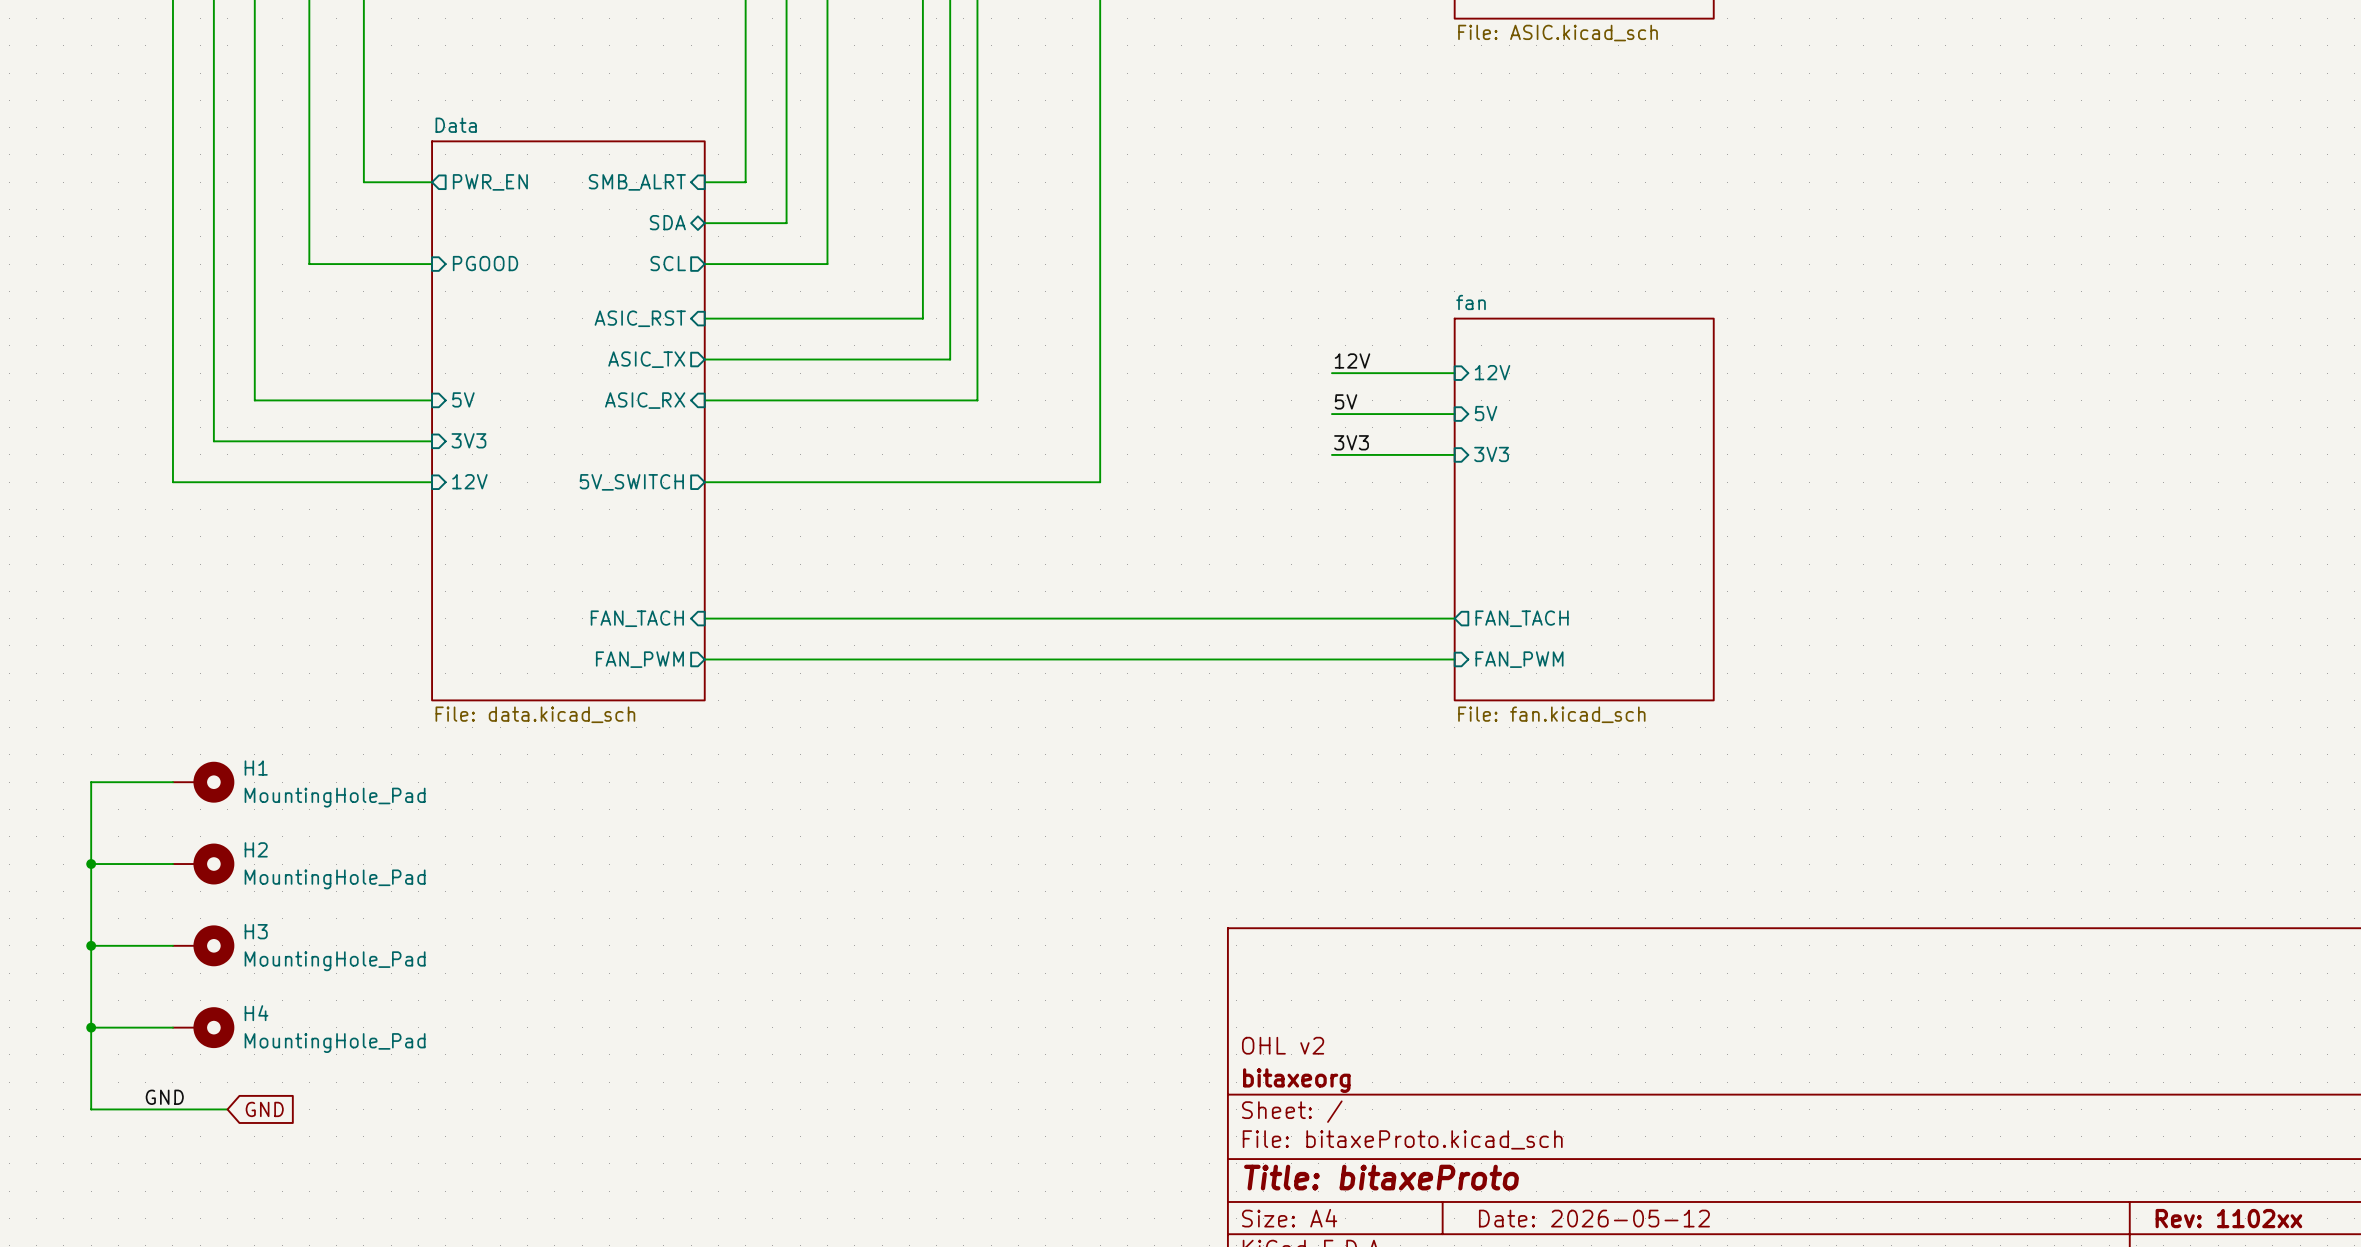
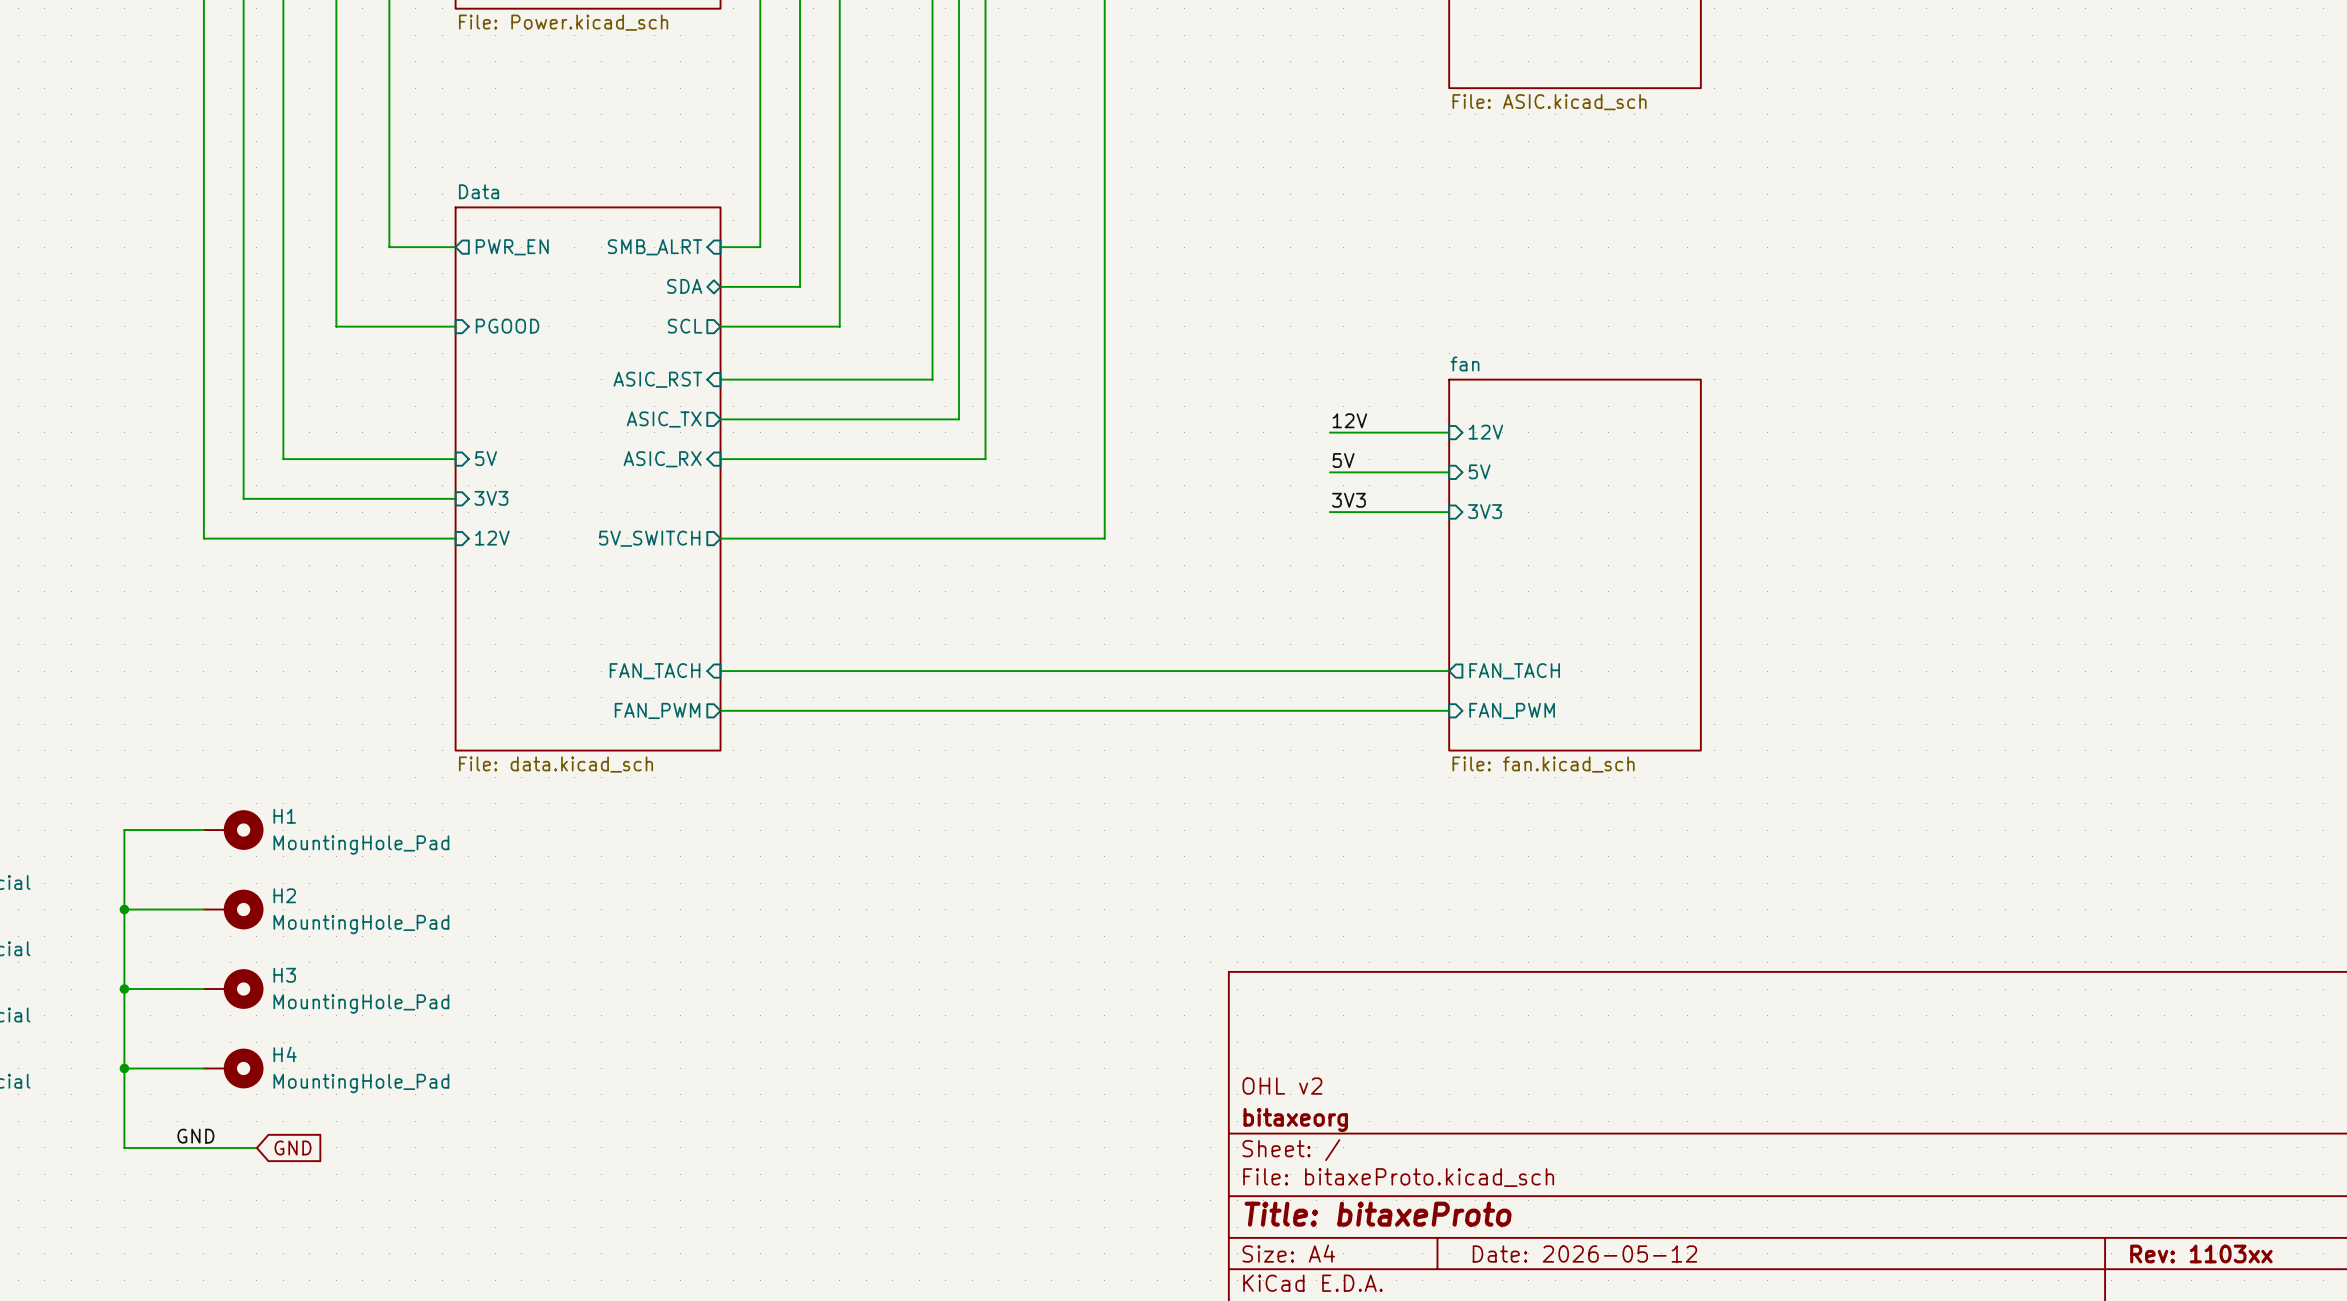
title block: Rev: 1102xx (2228, 1218) -> Rev: 1103xx (2201, 1254)

